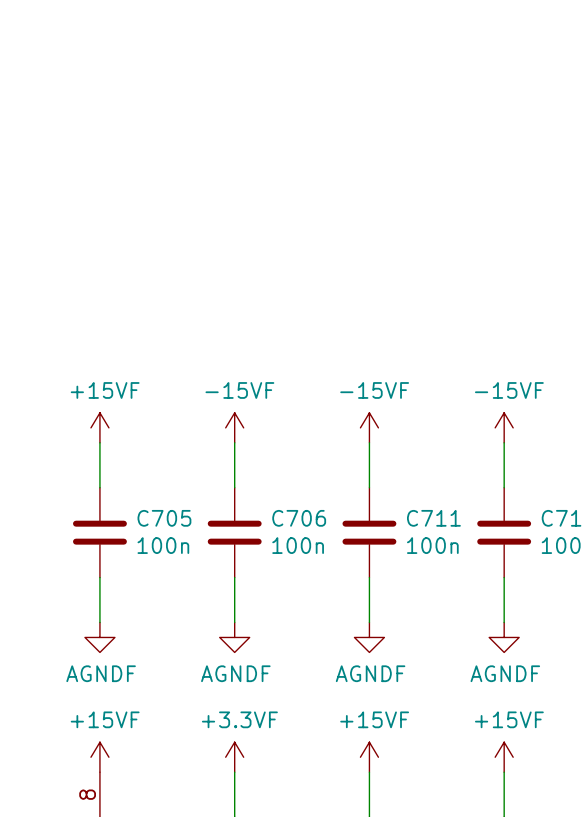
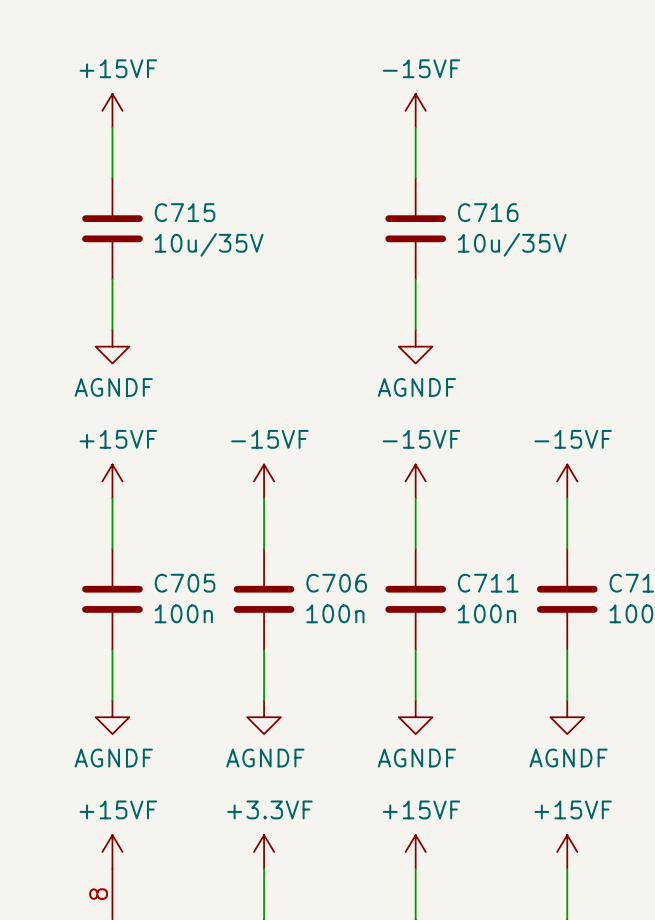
power symbol: none -> +15VF (112, 110)
power symbol: none -> -15VF (415, 110)
wire: none -> (112, 127) (112, 178)
wire: none -> (415, 127) (415, 178)
C715: none -> 10u/35V (112, 228)
C716: none -> 10u/35V (415, 228)
wire: none -> (112, 279) (112, 329)
wire: none -> (415, 279) (415, 329)
power symbol: none -> AGNDF (112, 346)
power symbol: none -> AGNDF (415, 346)

